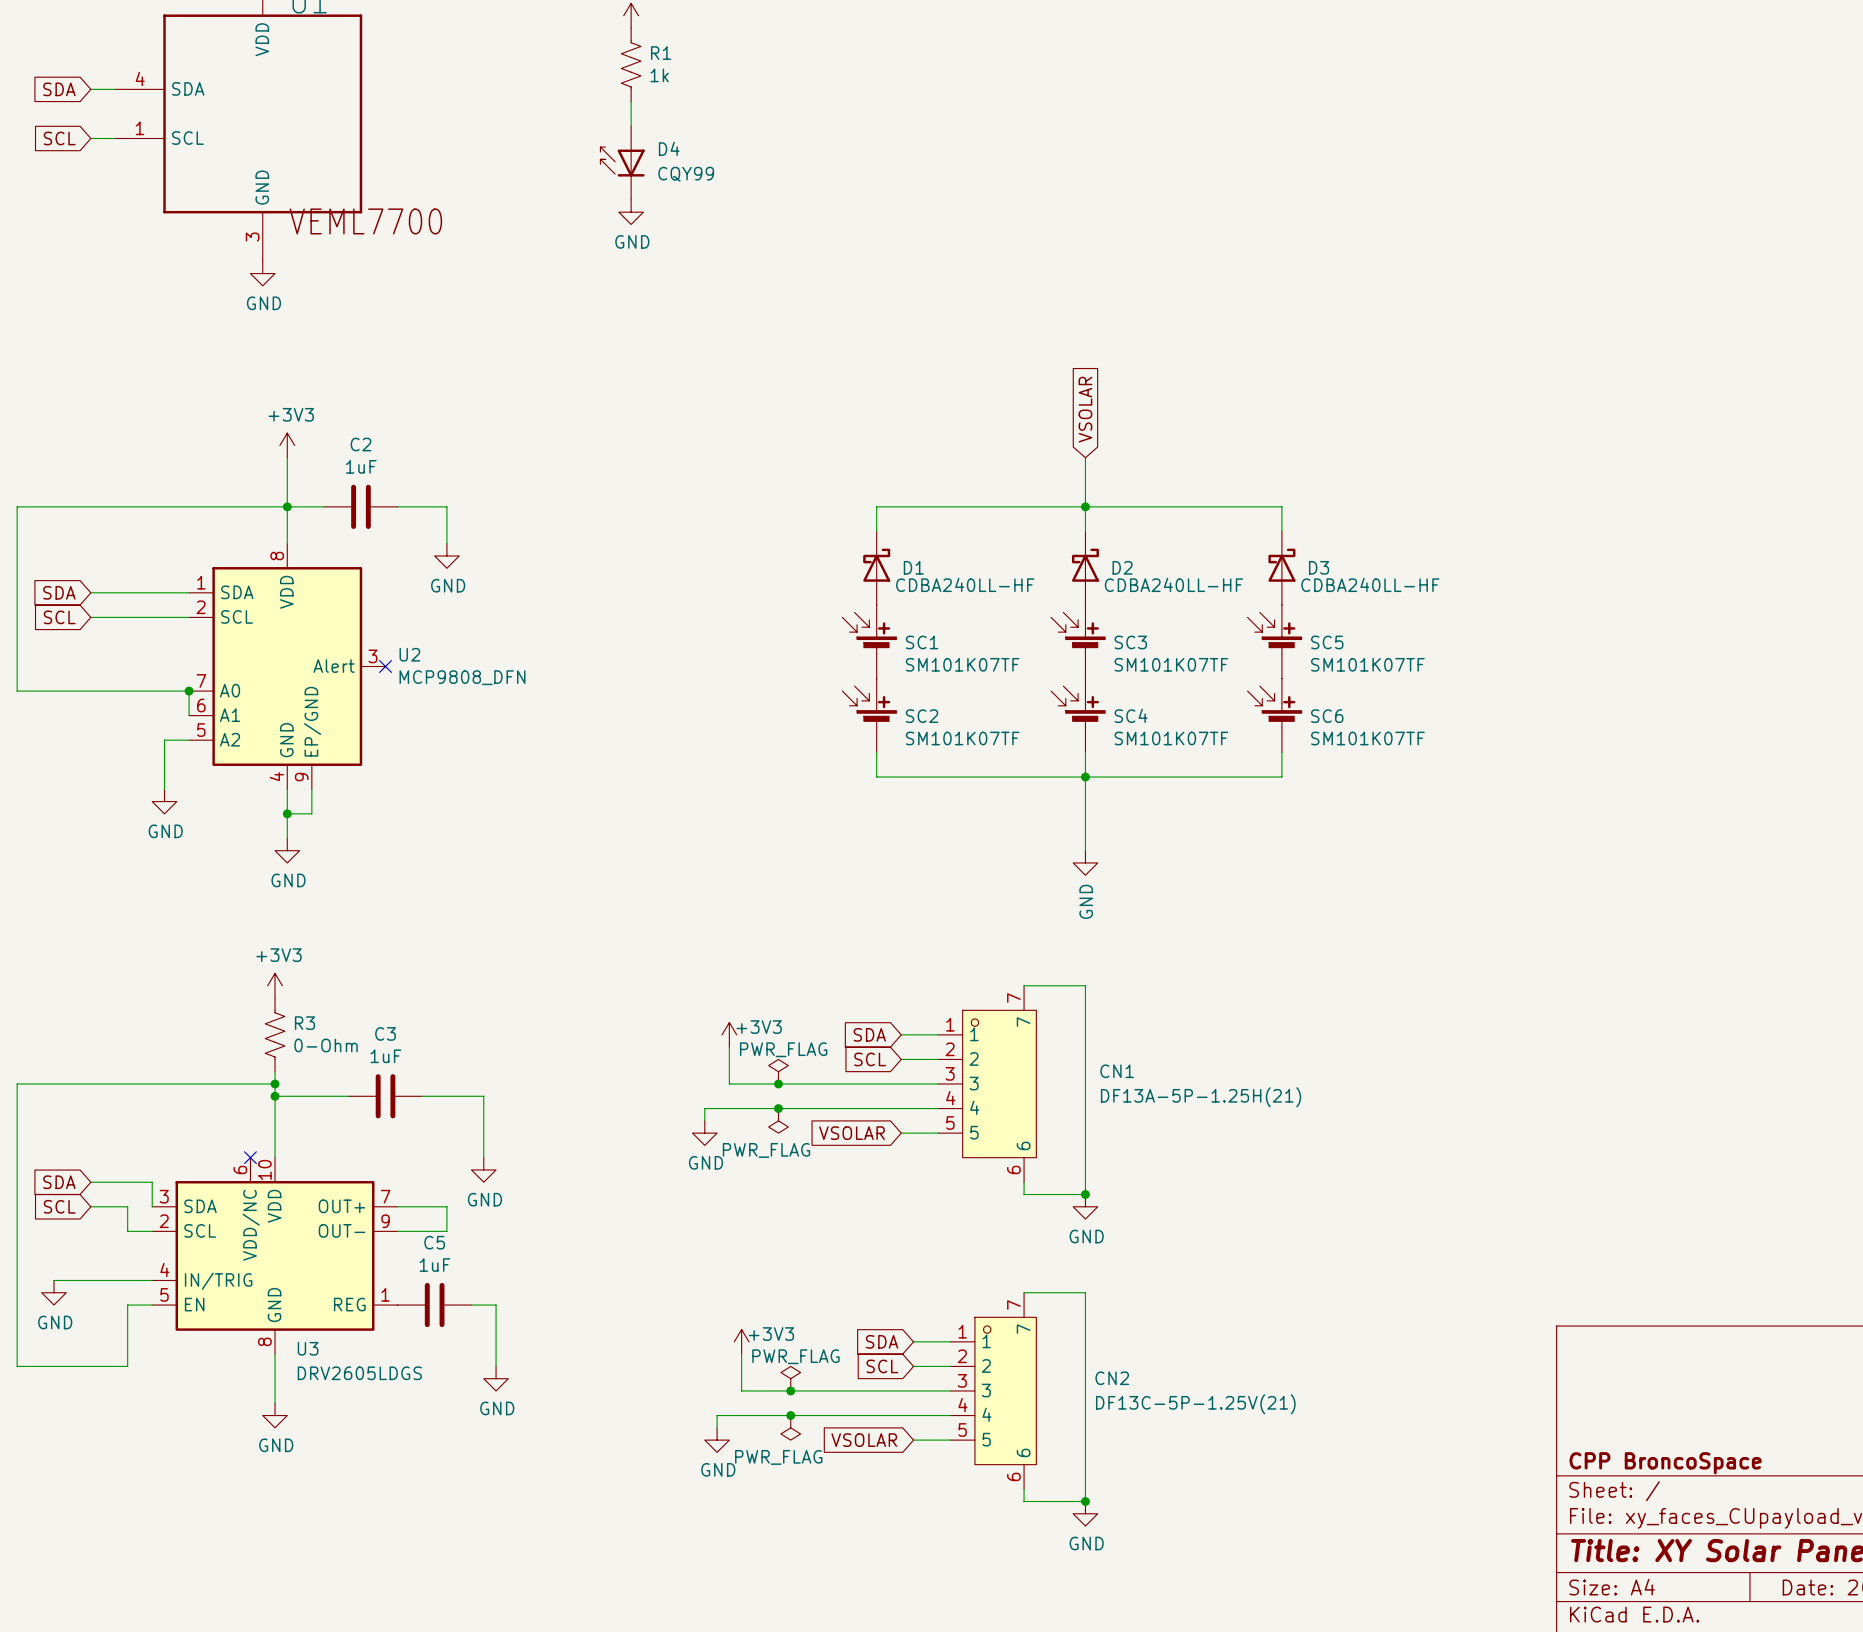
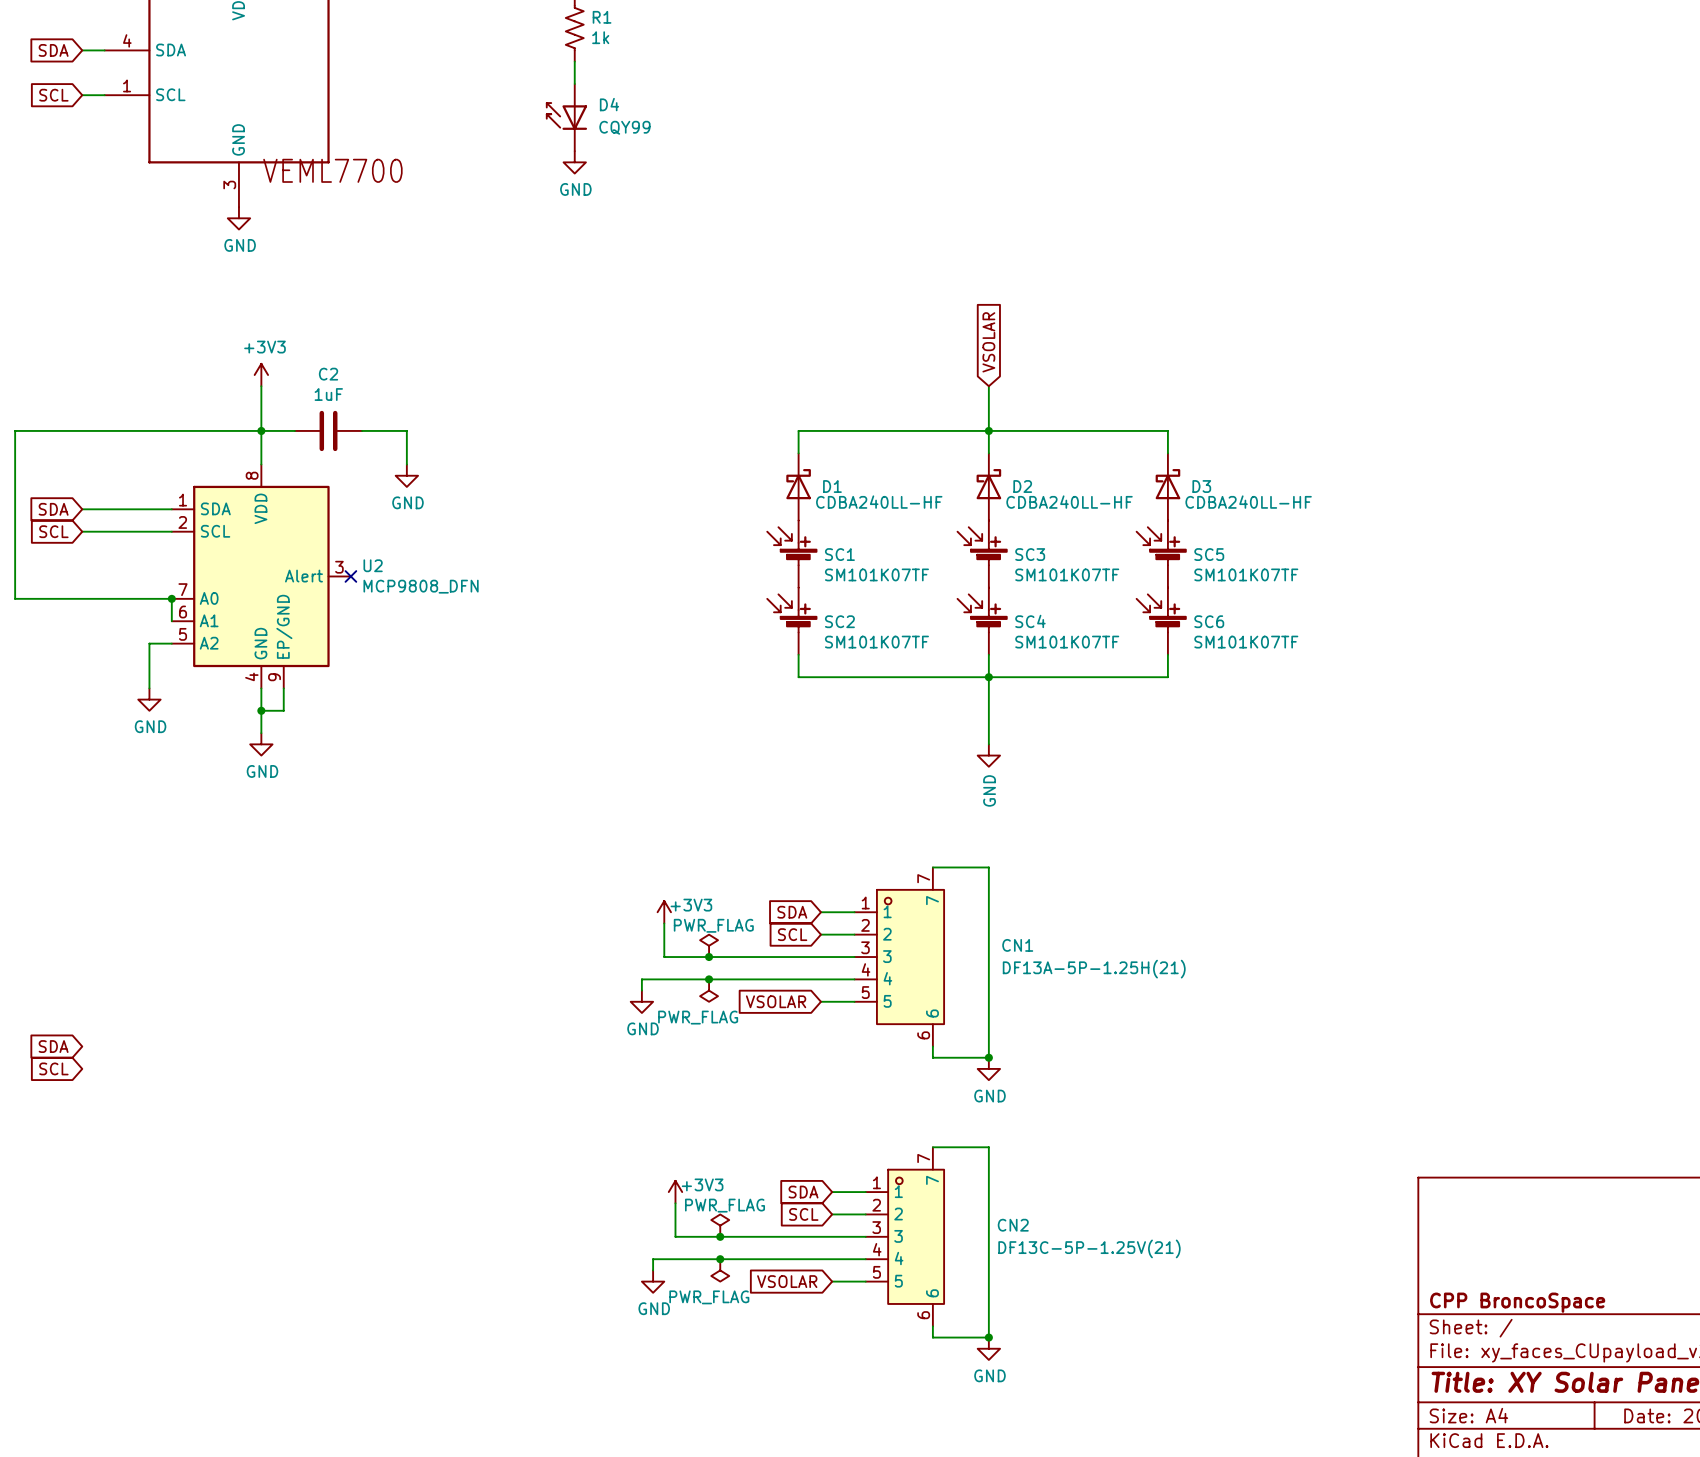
power symbol: +3V3 (275, 985) -> none
R3: 0-Ohm (275, 1034) -> none
wire: (275, 1071) (275, 1157) -> none
wire: (275, 1084) (17, 1084) (17, 1366) (127, 1366) (127, 1305) (152, 1305) -> none
junction: (275, 1084) -> none
wire: (275, 1096) (348, 1096) -> none
junction: (275, 1096) -> none
C3: 1uF (385, 1096) -> none
wire: (422, 1096) (483, 1096) (483, 1157) -> none
no-connect mark: (250, 1157) -> none
power symbol: GND (483, 1169) -> none
wire: (90, 1182) (152, 1182) (152, 1206) -> none
wire: (90, 1206) (127, 1206) (127, 1231) (152, 1231) -> none
wire: (397, 1206) (446, 1206) (446, 1231) (397, 1231) -> none
U3: DRV2605LDGS (275, 1255) -> none
wire: (53, 1280) (152, 1280) -> none
power symbol: GND (53, 1292) -> none
C5: 1uF (434, 1305) -> none
wire: (471, 1305) (496, 1305) (496, 1366) -> none
wire: (275, 1354) (275, 1403) -> none
power symbol: GND (496, 1378) -> none
power symbol: GND (275, 1415) -> none

